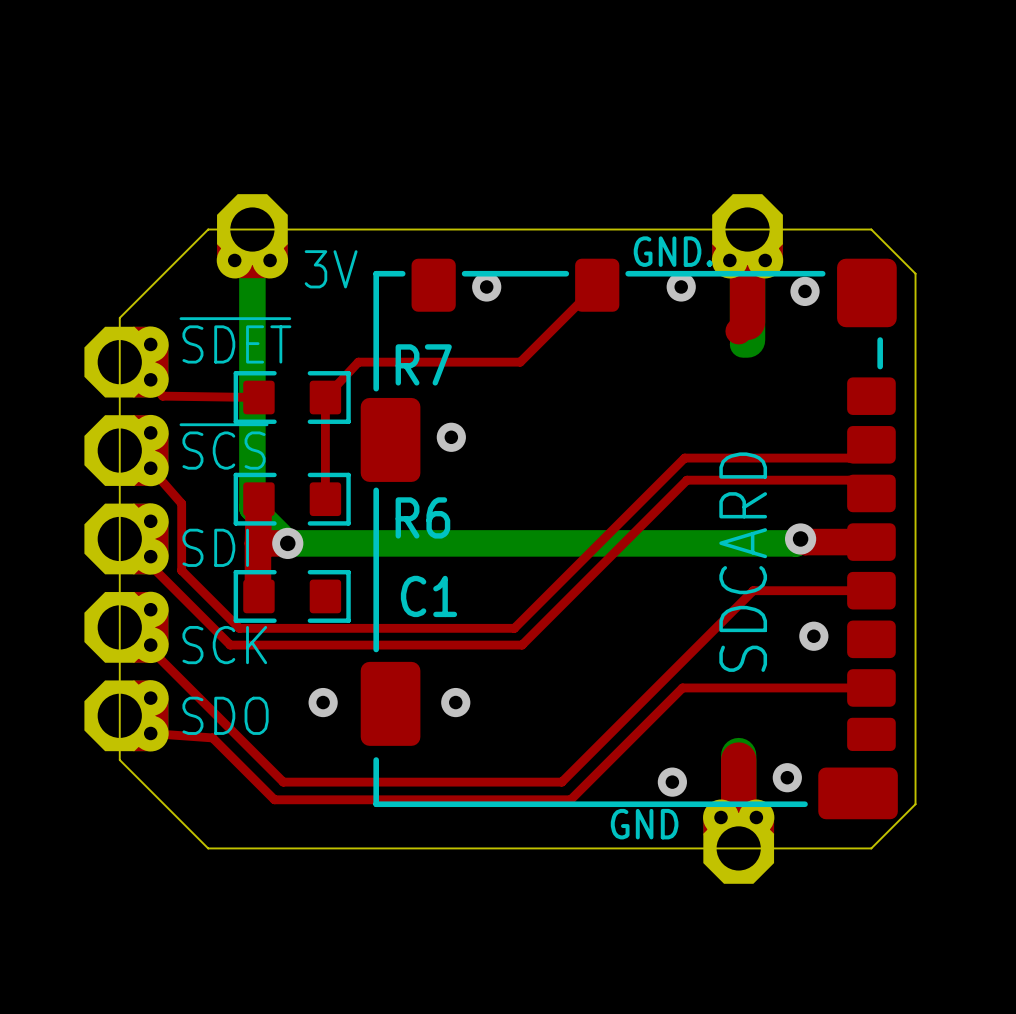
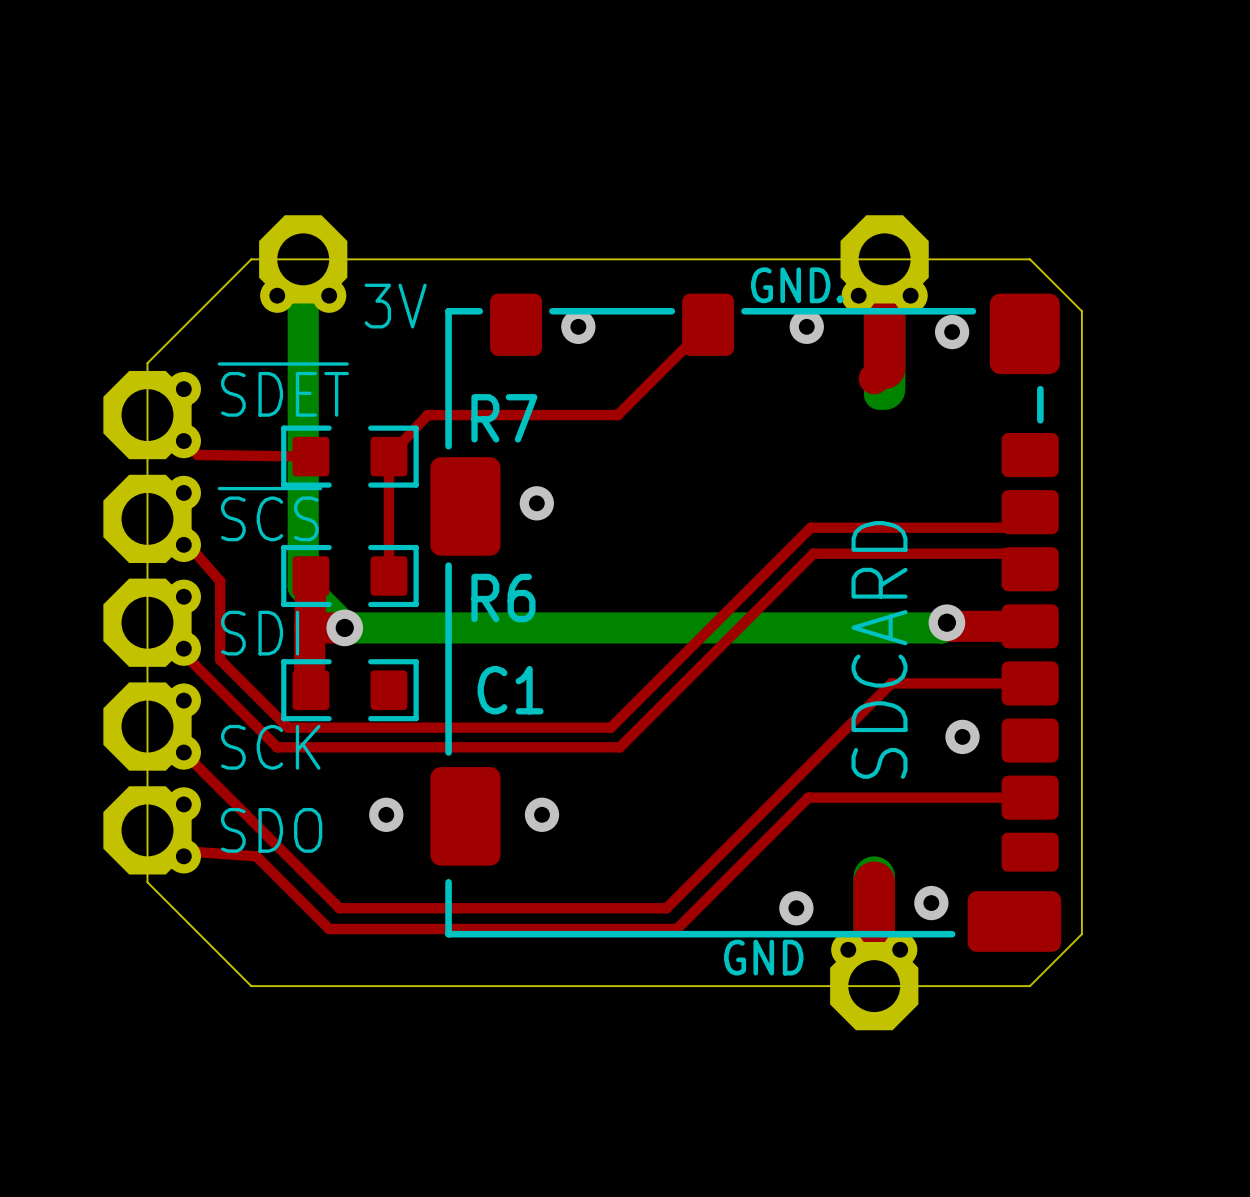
3V footprint: [216, 194, 289, 279] -> [259, 215, 348, 313]
GND. footprint: [711, 194, 784, 279] -> [840, 215, 929, 313]
~{SDET} footprint: [84, 326, 169, 398] -> [103, 370, 201, 460]
~{SCS} footprint: [84, 414, 169, 487] -> [103, 474, 201, 564]
SDI footprint: [84, 503, 169, 575] -> [103, 578, 201, 667]
SCK footprint: [84, 591, 169, 664] -> [103, 682, 201, 771]
SDO footprint: [84, 680, 169, 752] -> [103, 786, 201, 875]
GND footprint: [703, 799, 775, 884] -> [830, 932, 919, 1031]

